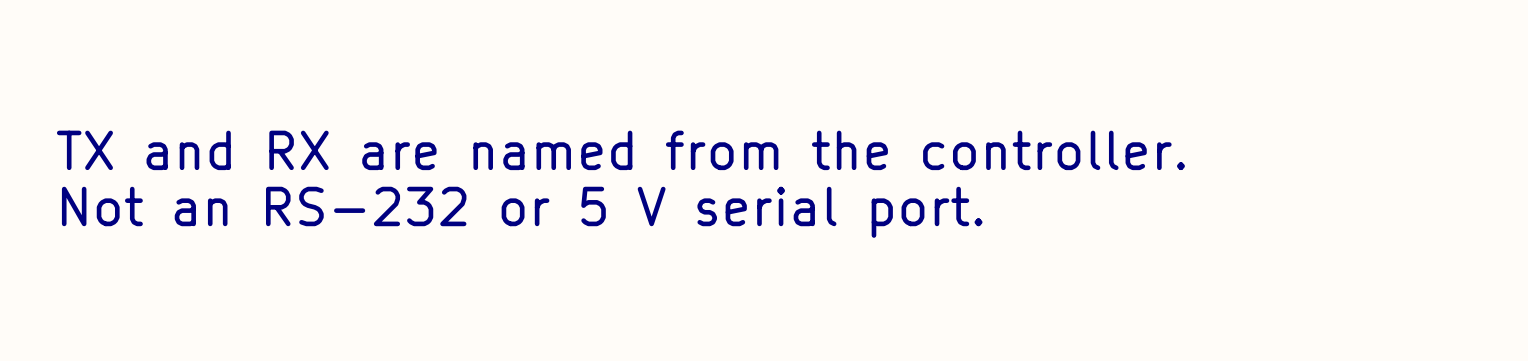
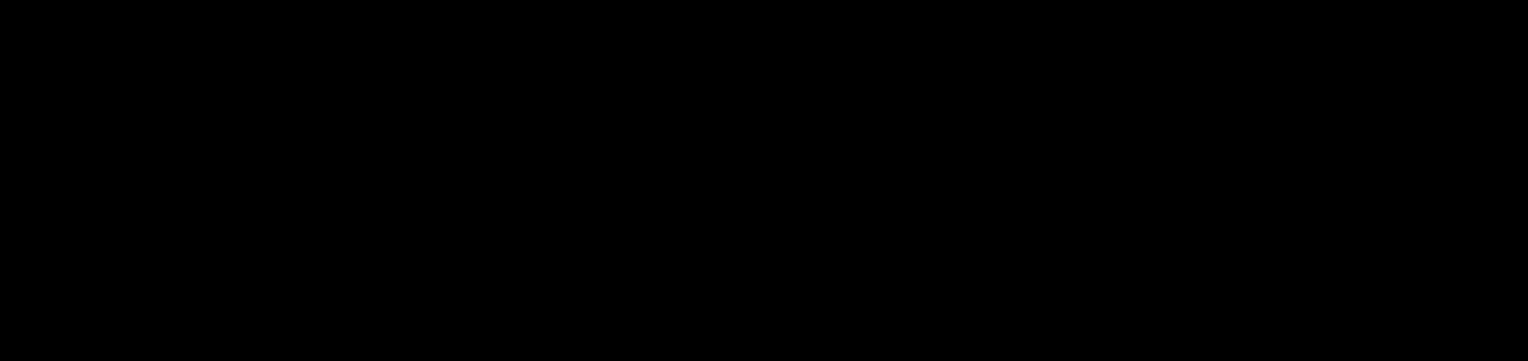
text: TX and RX are named from the controller. (620, 150) -> none
text: Not an RS-232 or 5 V serial port. (522, 212) -> none

